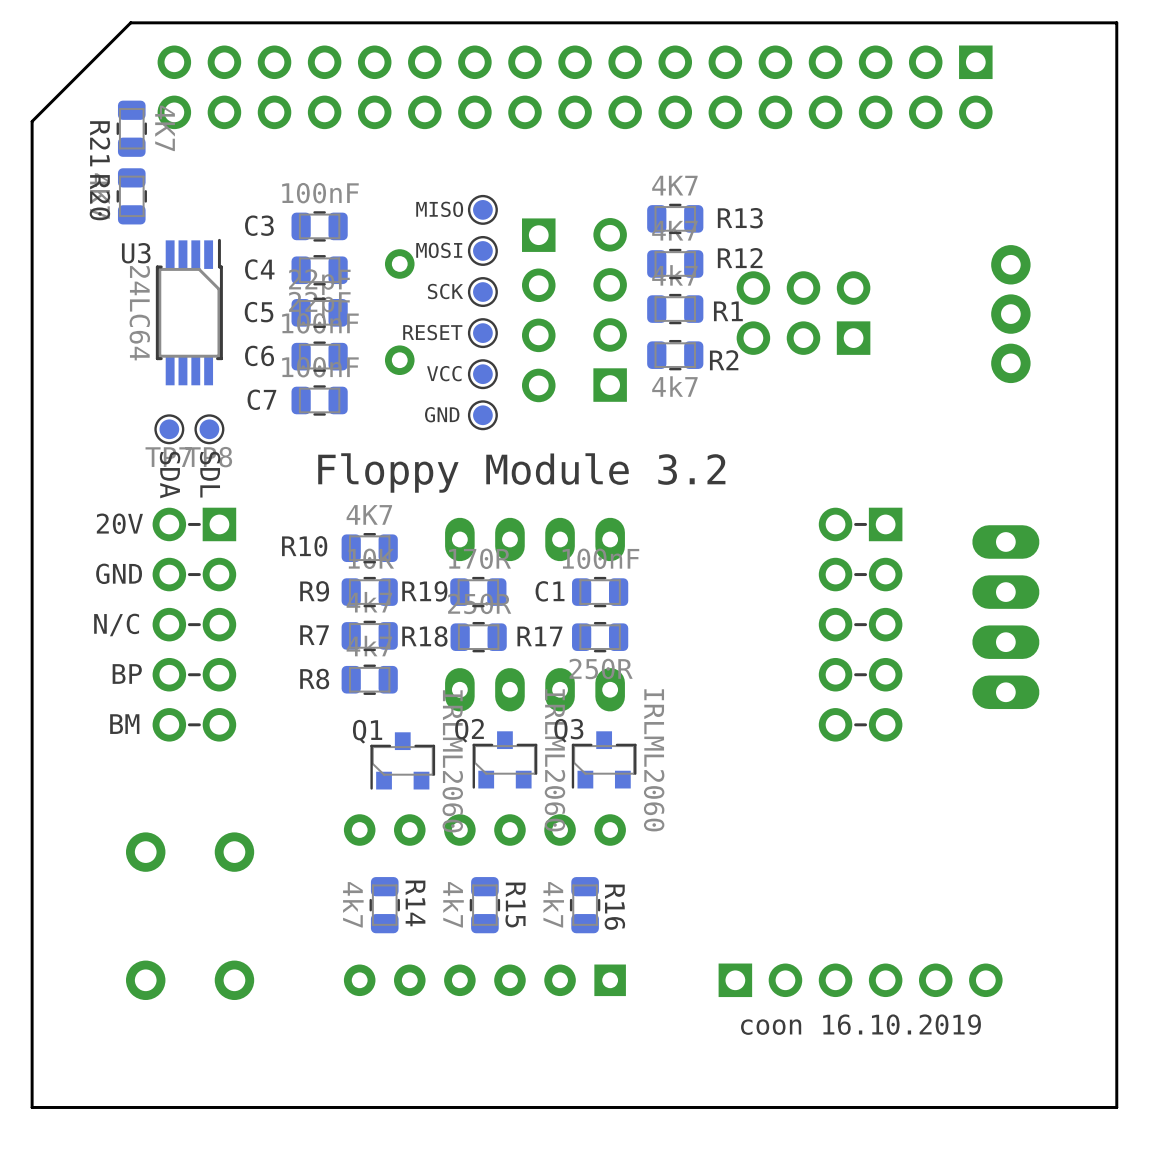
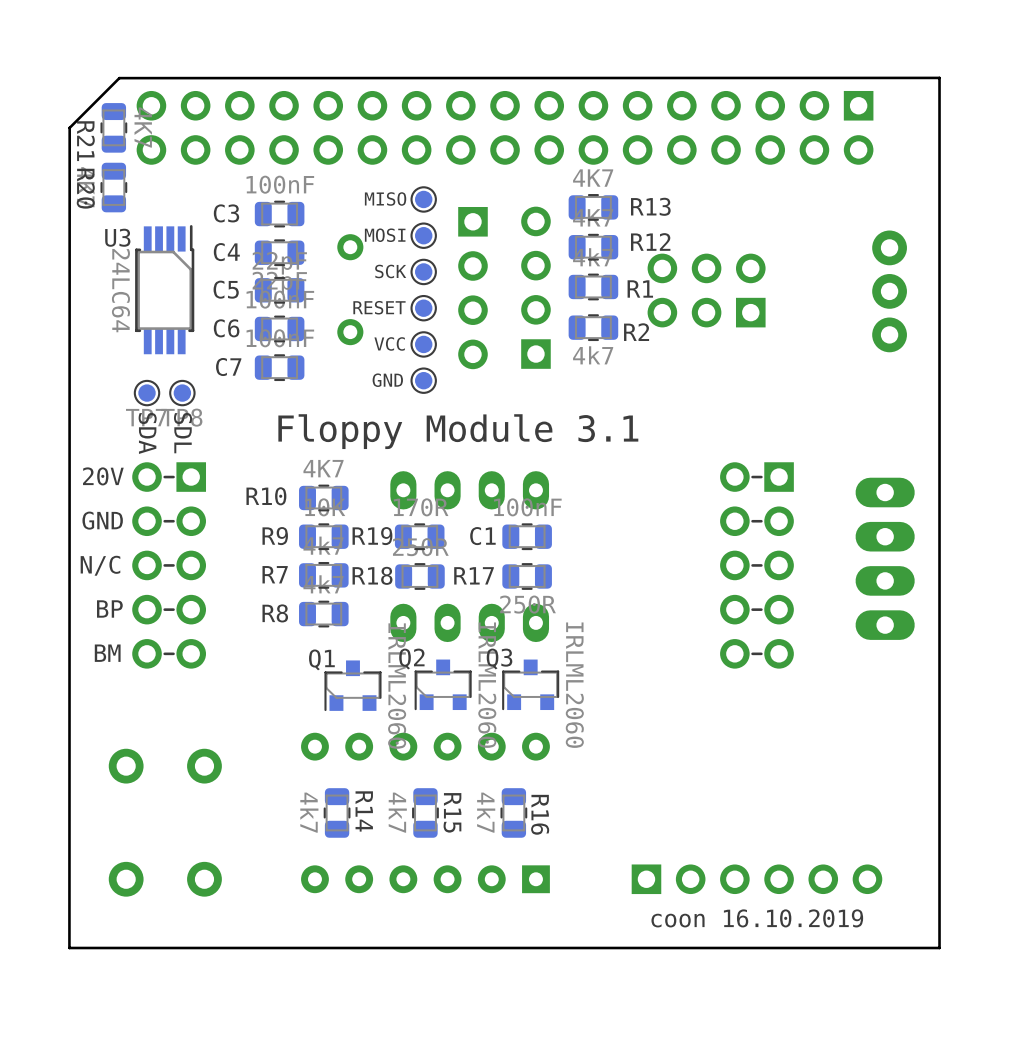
board edge: (1116, 22) (1116, 1107) (32, 1107) (32, 121) (130, 22) (1116, 22) -> (939, 77) (939, 947) (69, 947) (69, 127) (119, 78) (939, 77)
part position: (575, 87) -> (505, 127)
text: Floppy Module 3.2 (521, 472) -> Floppy Module 3.1 (458, 431)

